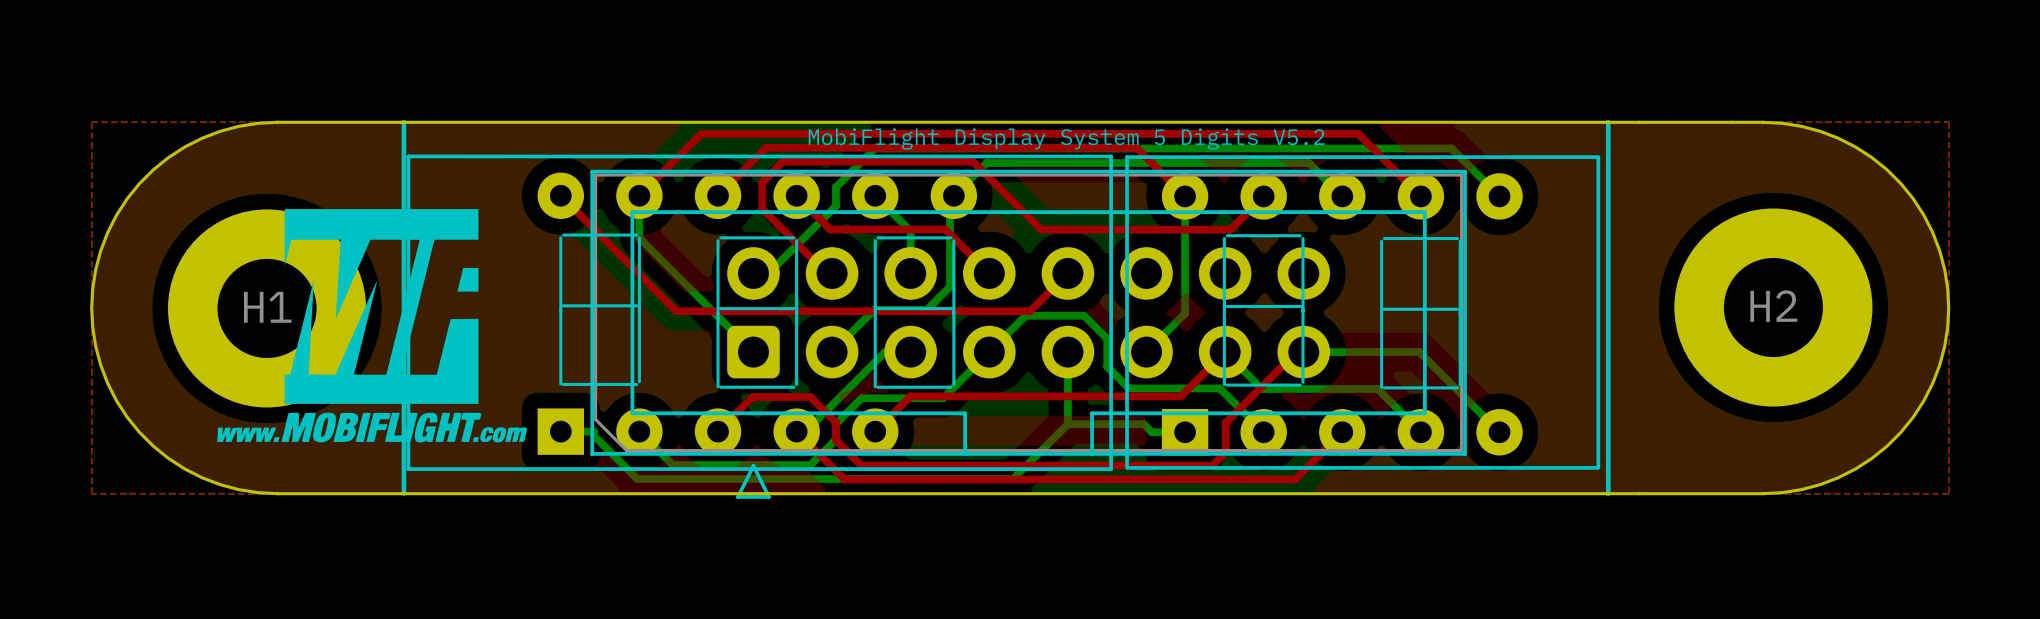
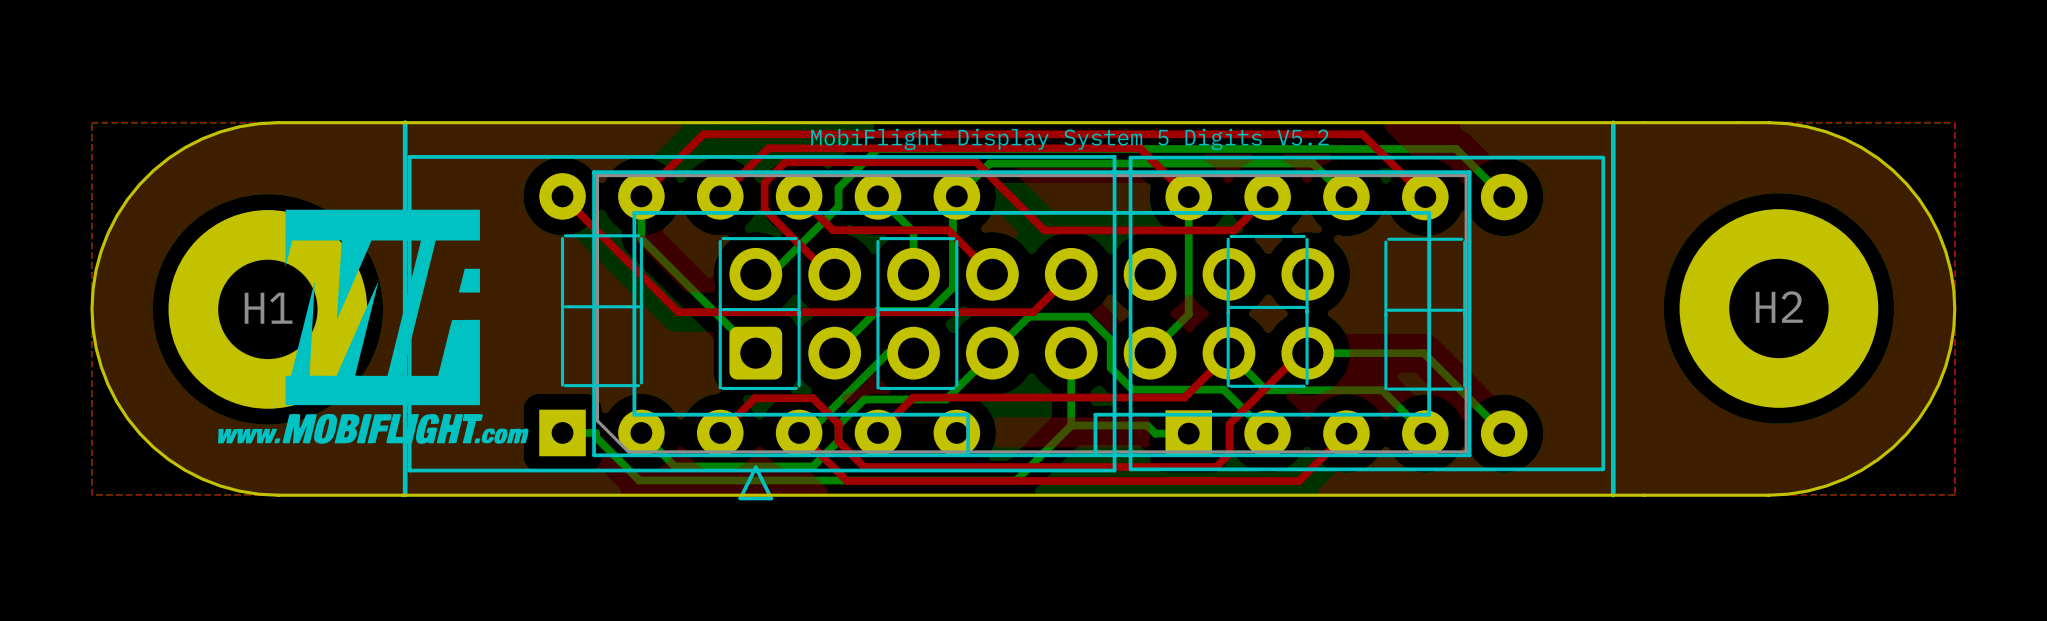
part footprint: [406, 154, 1113, 471] -> [407, 155, 1117, 473]

